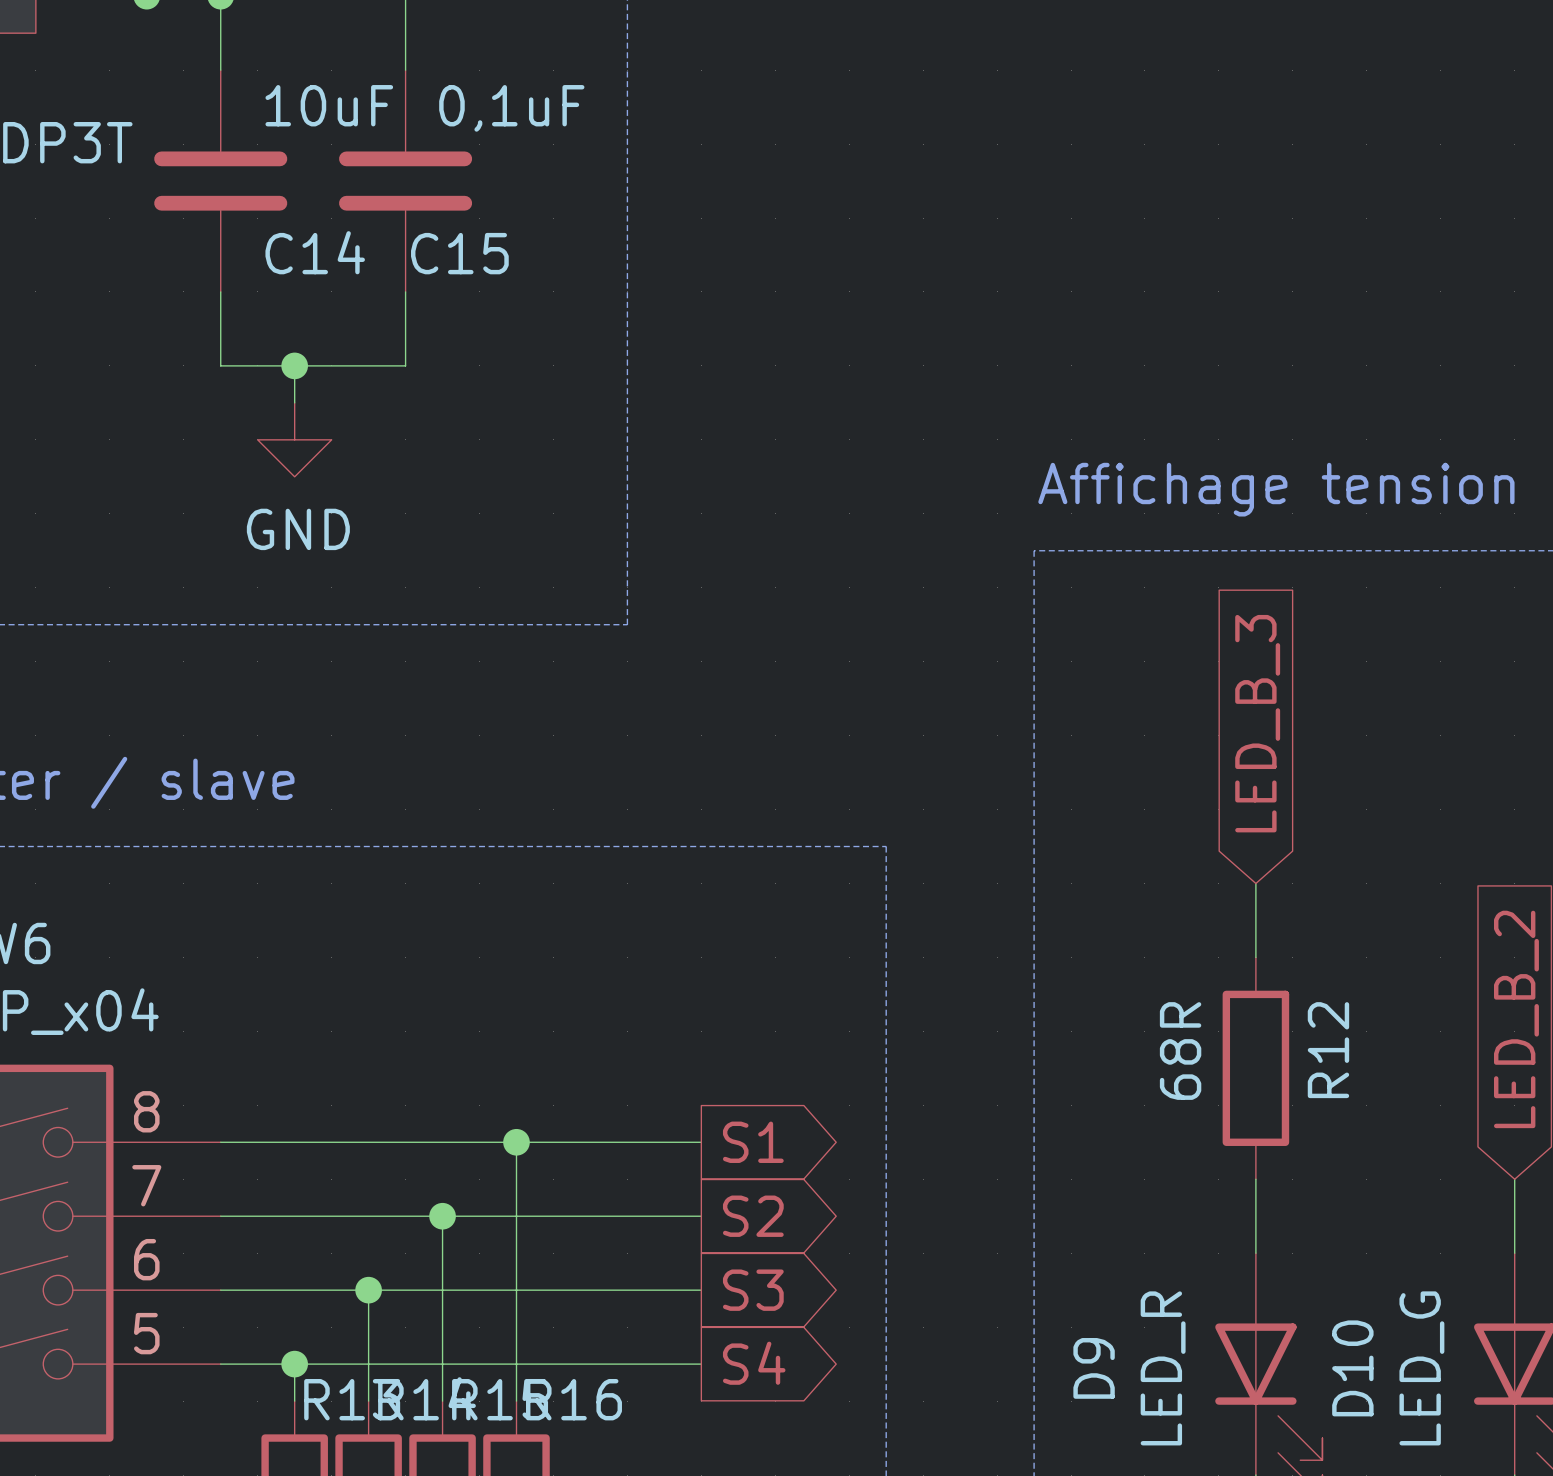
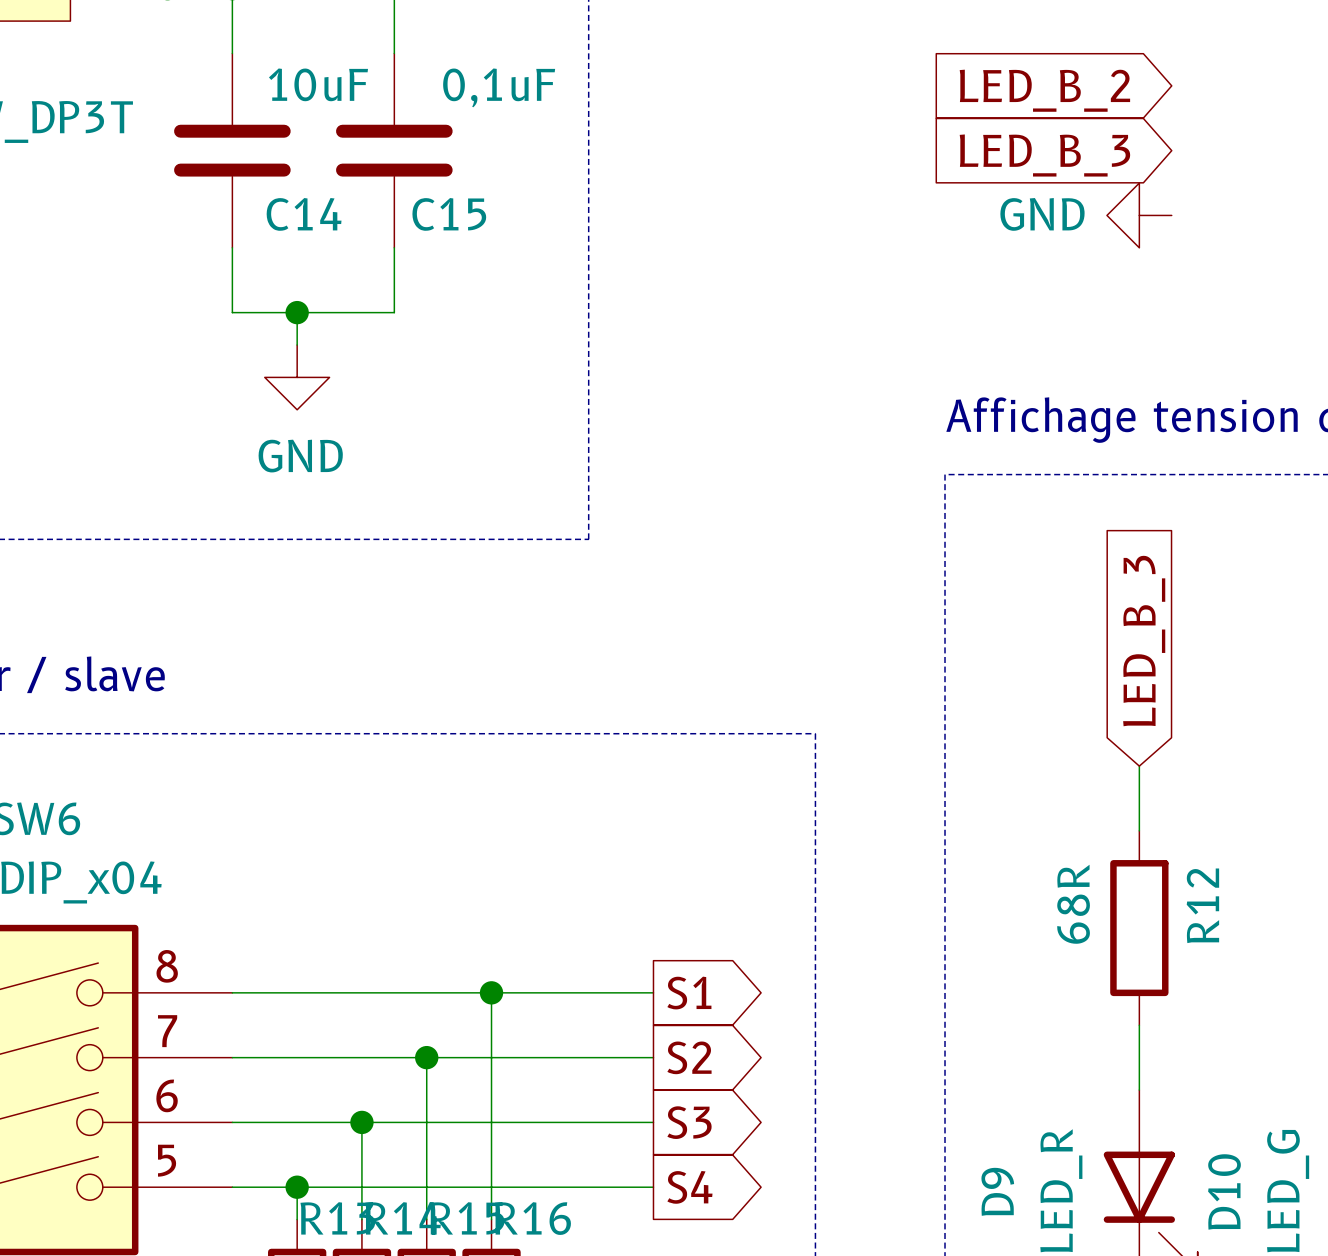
global label: none -> LED_B_2 (1044, 90)
global label: none -> LED_B_3 (1044, 155)
power symbol: none -> GND (1139, 215)

